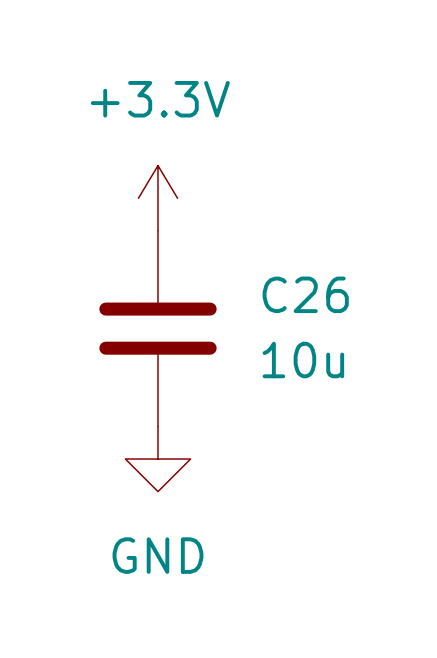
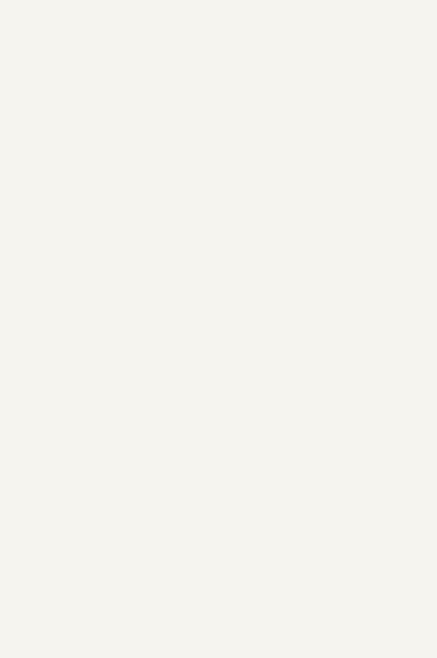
power symbol: +3.3V (157, 198) -> none
C26: 10u (157, 328) -> none
power symbol: GND (157, 459) -> none

